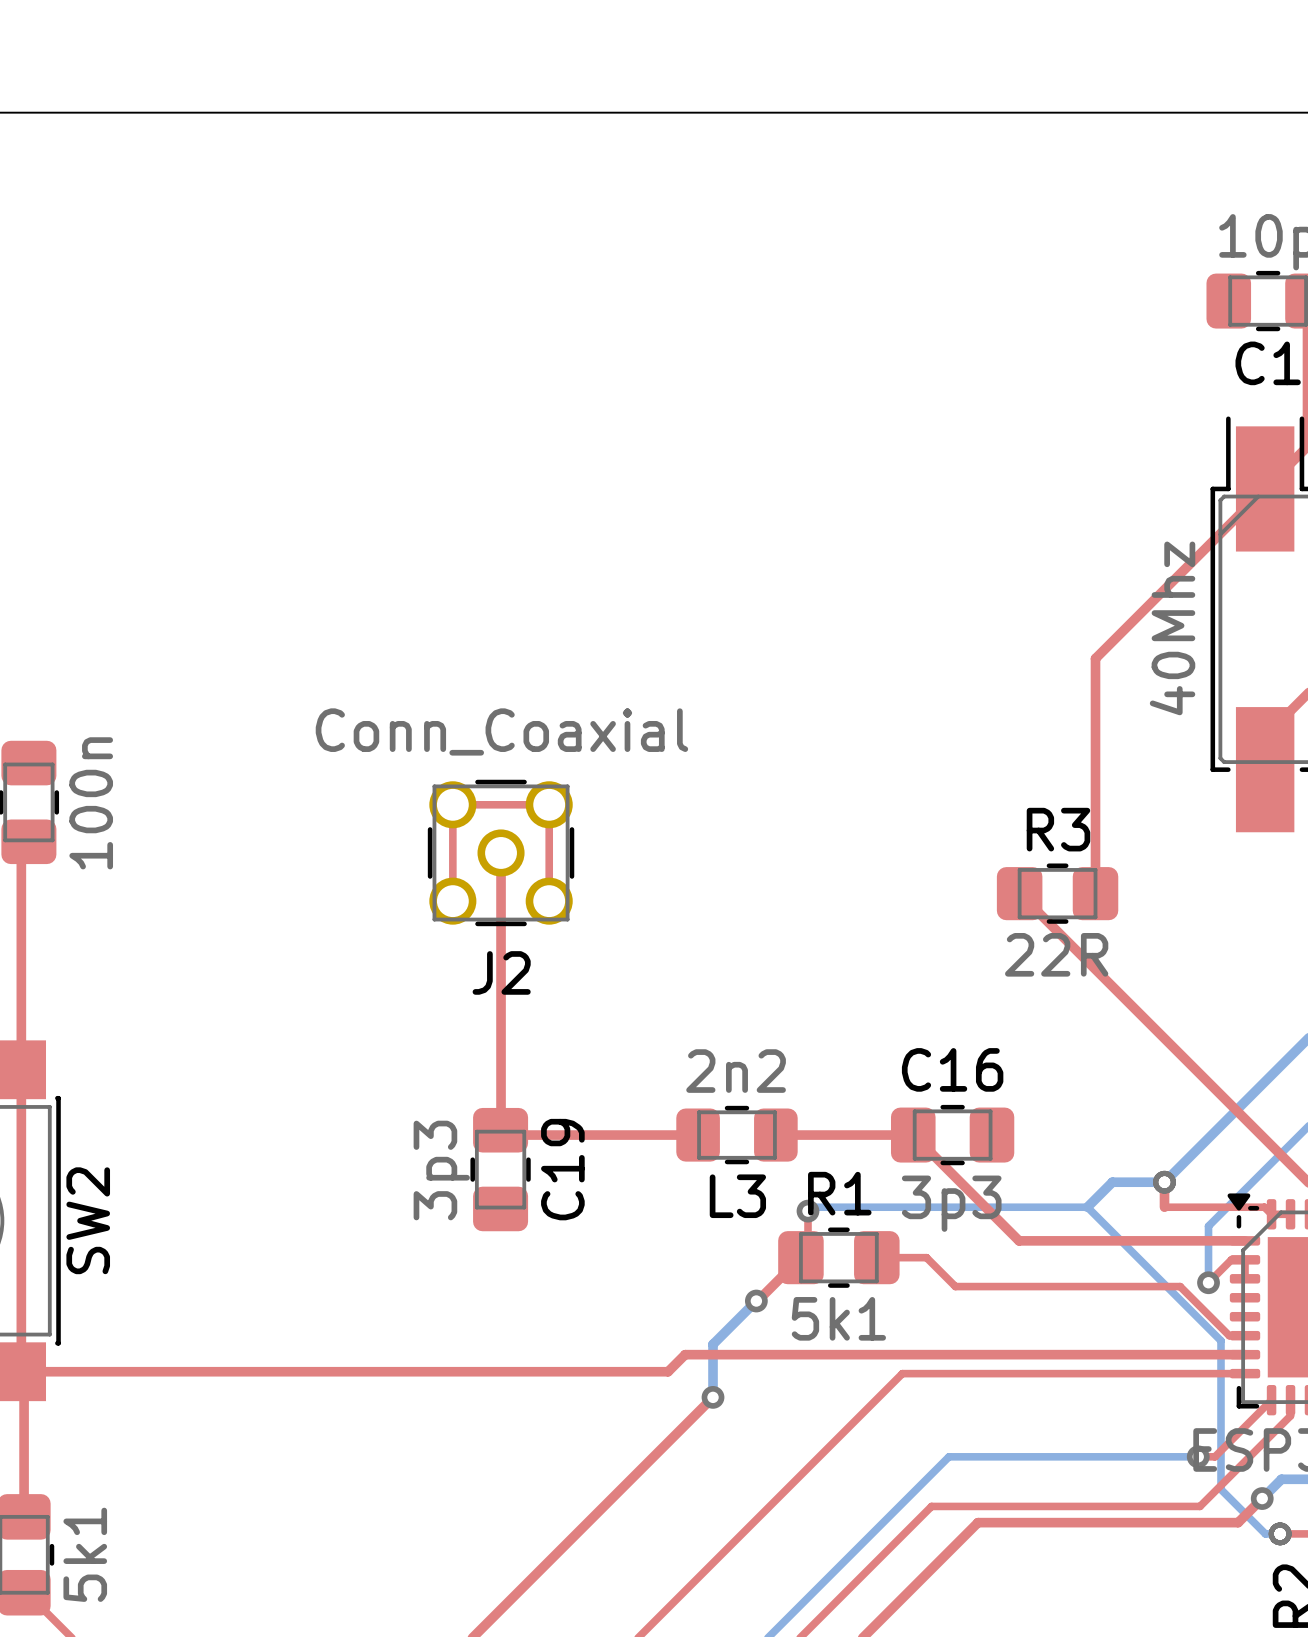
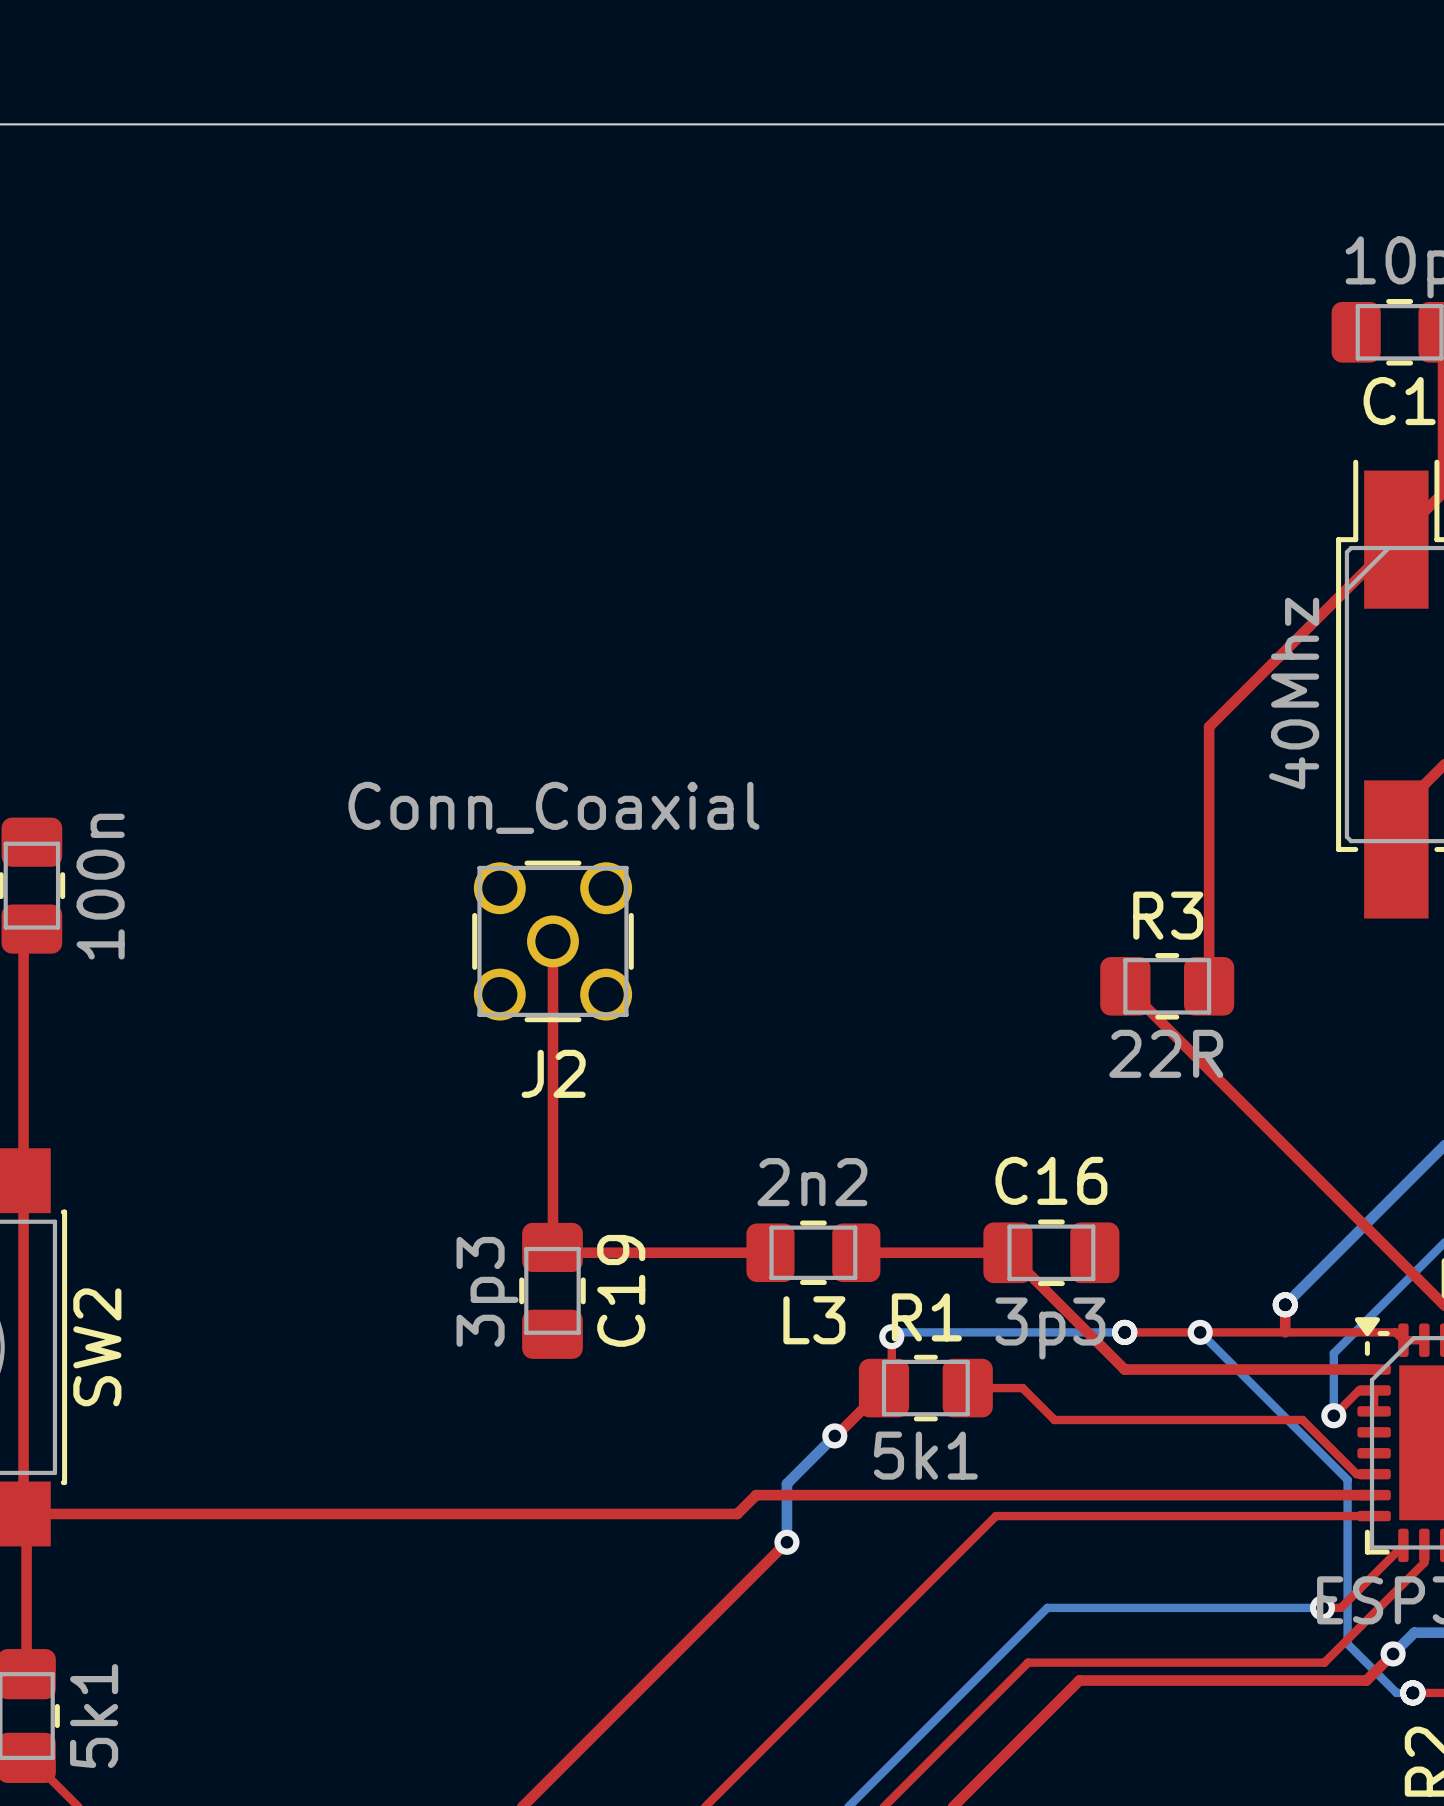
top track: (452, 901) (452, 804) (549, 804) (549, 901) -> none
bottom track: (1164, 1182) (1112, 1182) (1087, 1207) (1019, 1207) -> none
top track: none -> (1124, 1332) (1285, 1332)
via: none -> (1124, 1332)
via: none -> (1200, 1332)

